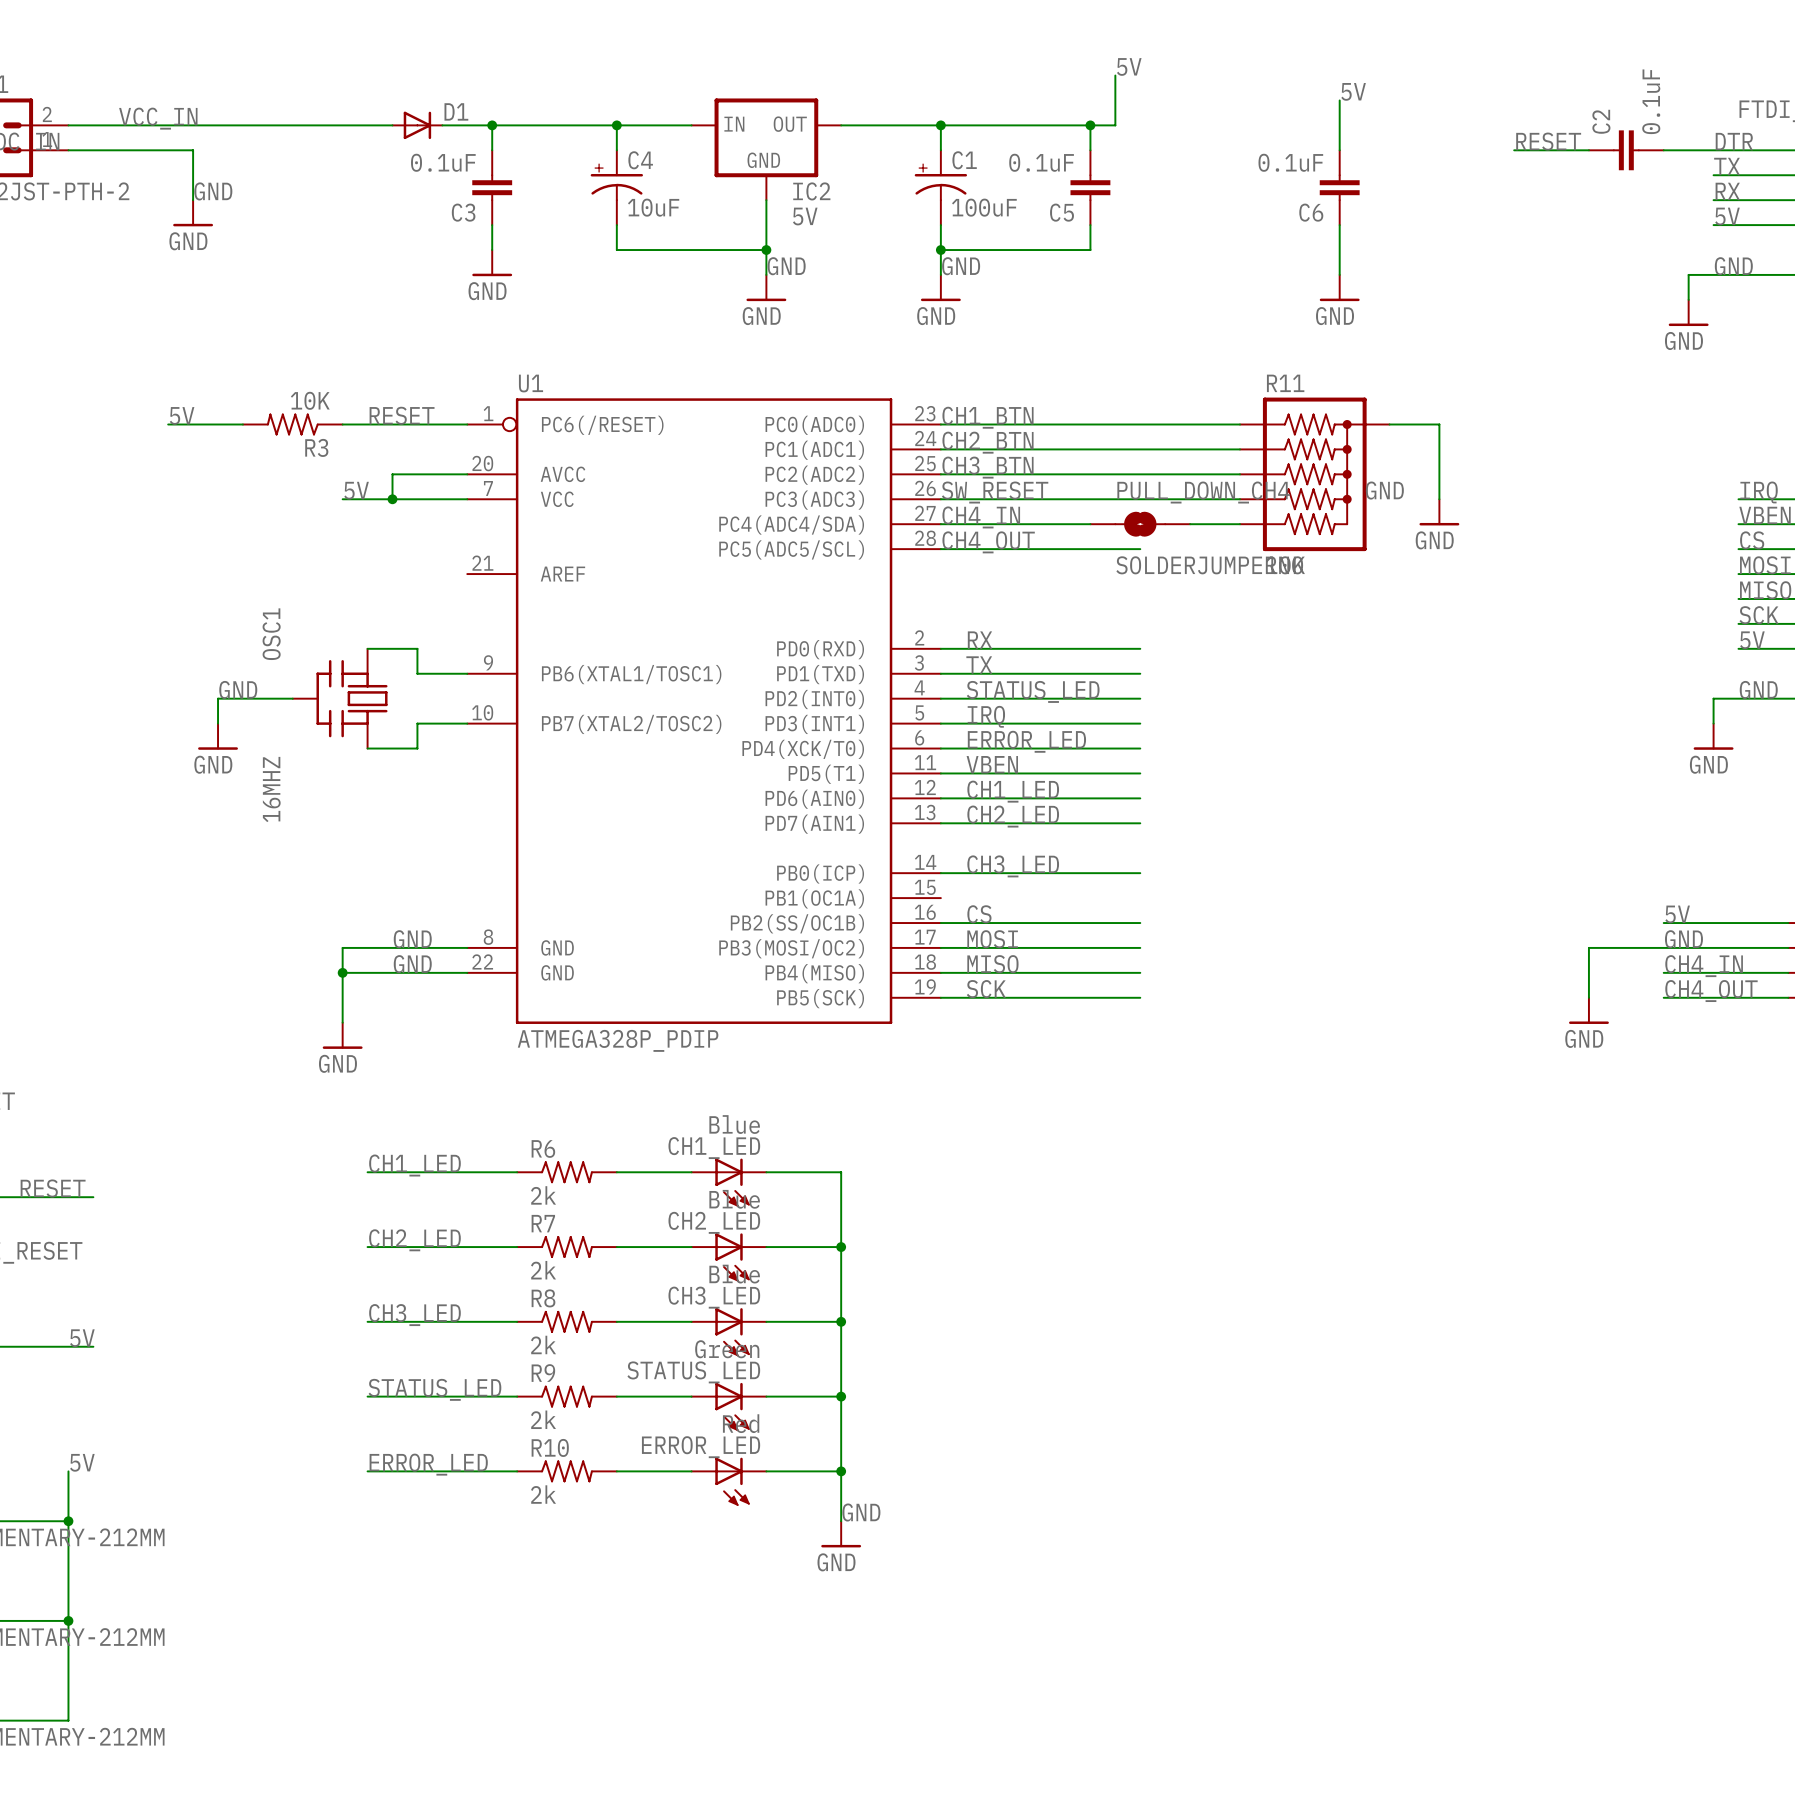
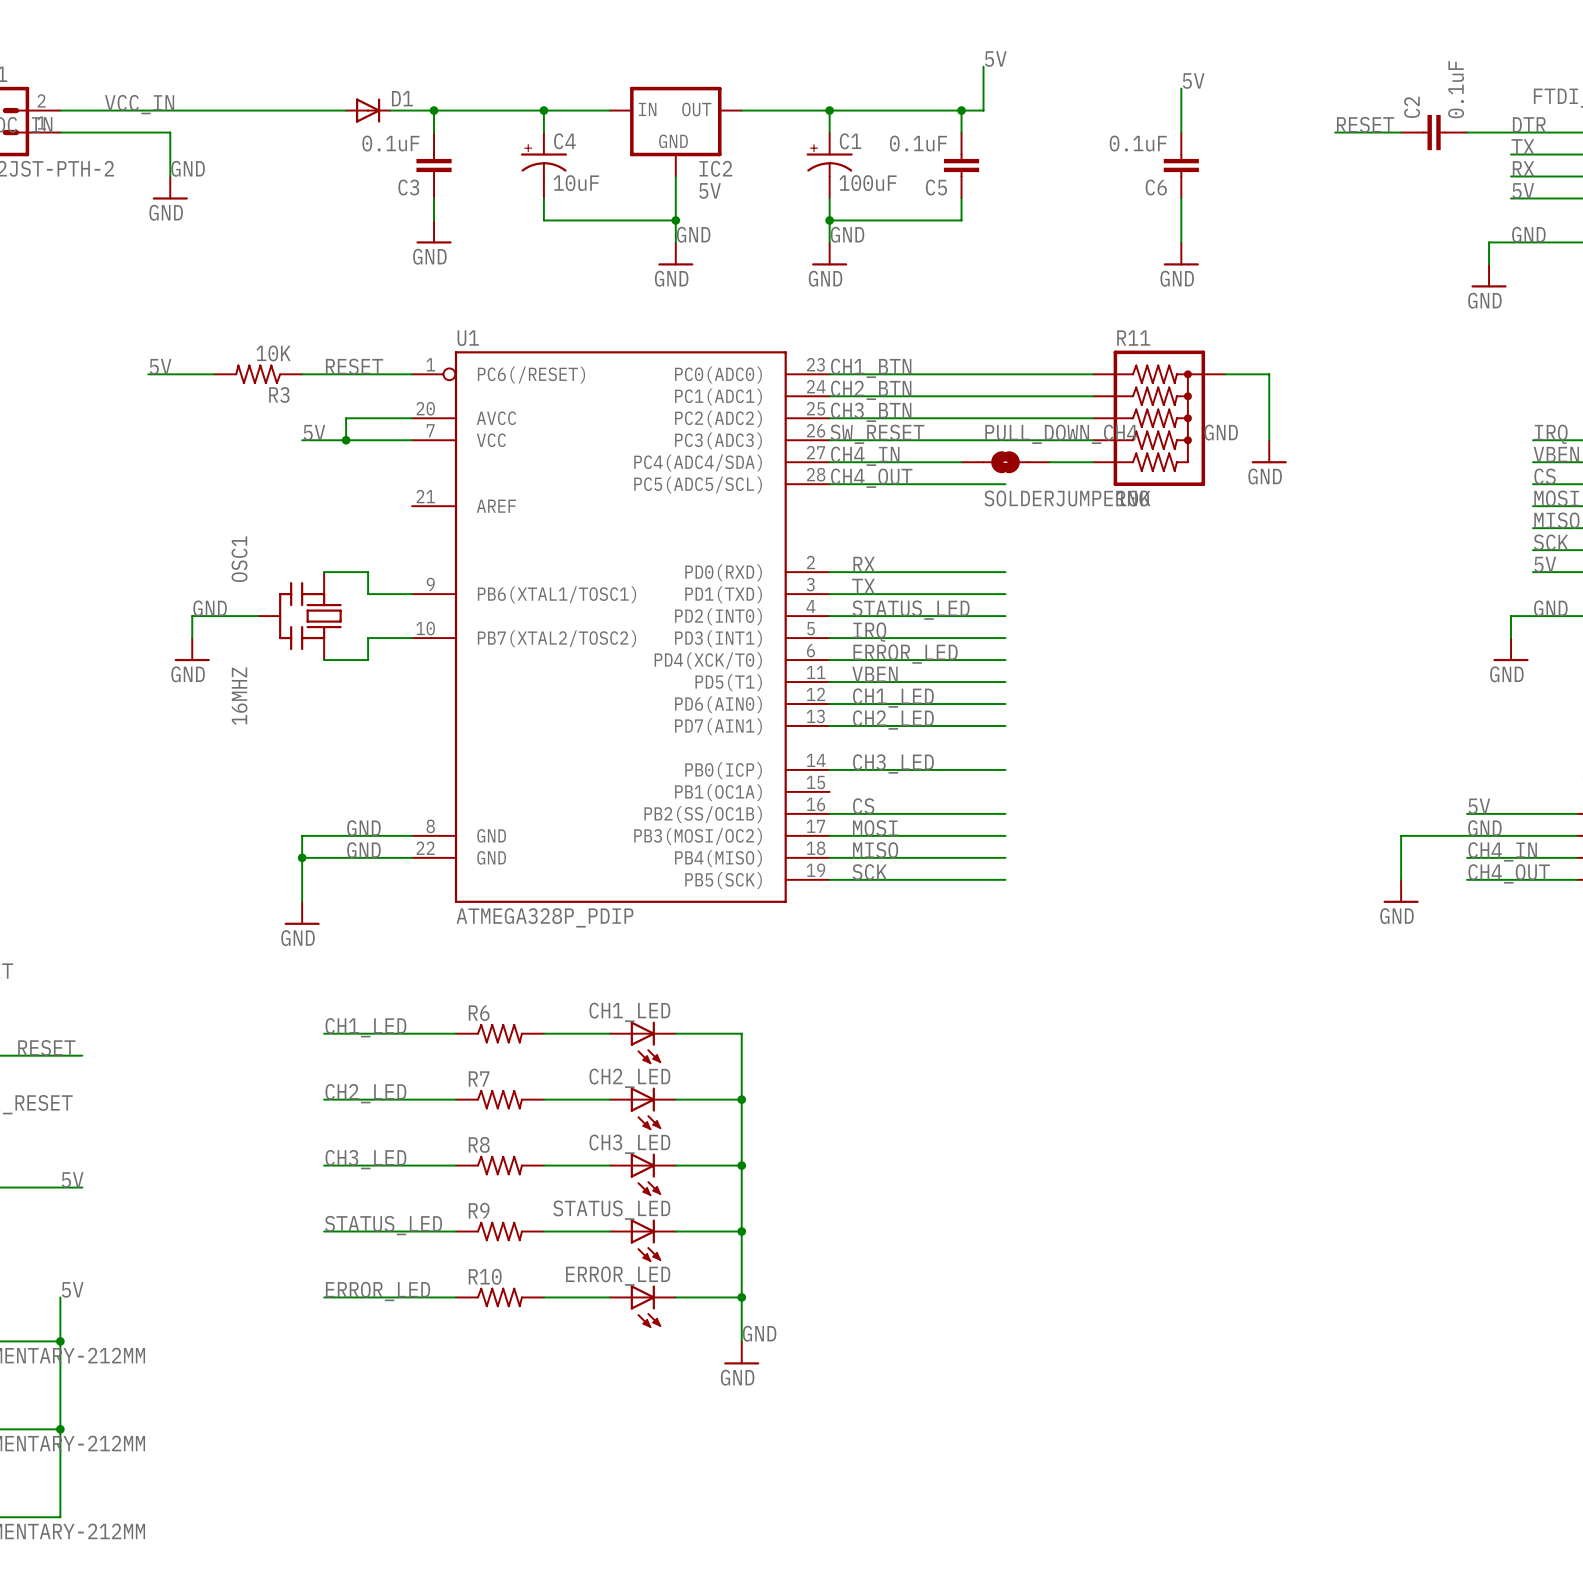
CH1_LED value: Blue (734, 1124) -> none
R6 value: 2k (543, 1195) -> none
CH2_LED value: Blue (734, 1199) -> none
R7 value: 2k (543, 1270) -> none
CH3_LED value: Blue (734, 1274) -> none
R8 value: 2k (543, 1344) -> none
STATUS_LED value: Green (727, 1349) -> none
R9 value: 2k (543, 1419) -> none
ERROR_LED value: Red (741, 1423) -> none
R10 value: 2k (543, 1494) -> none

